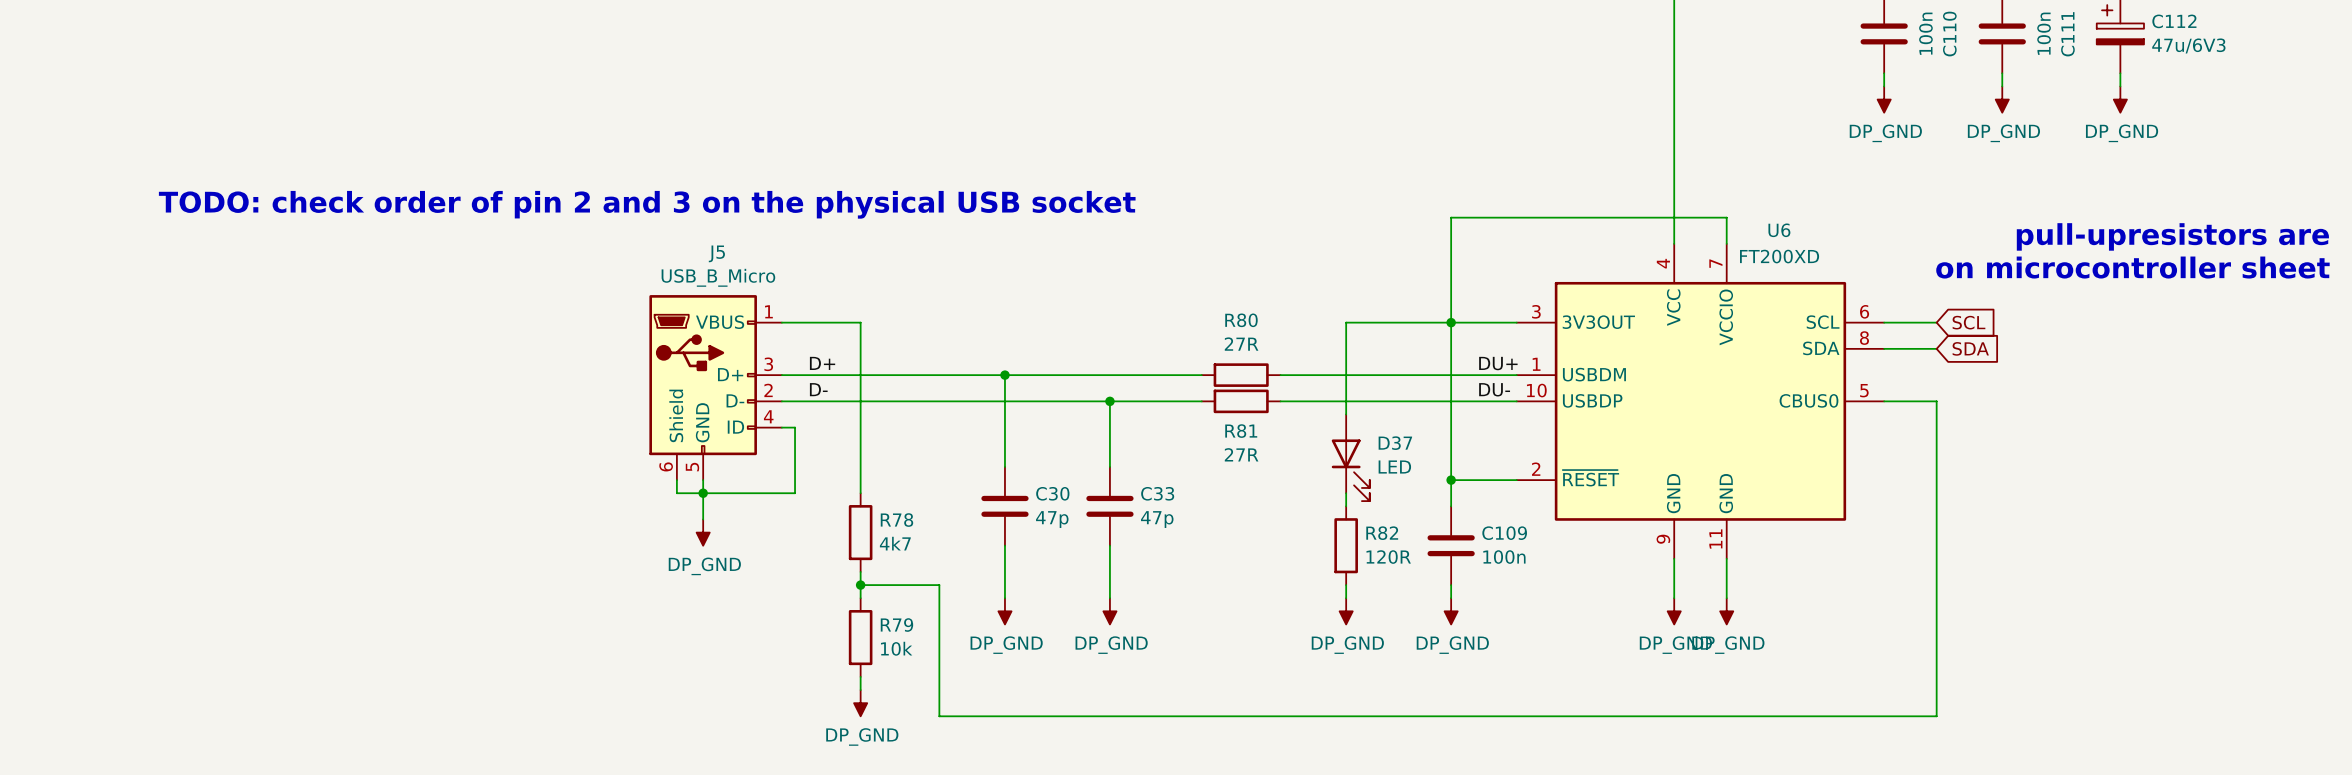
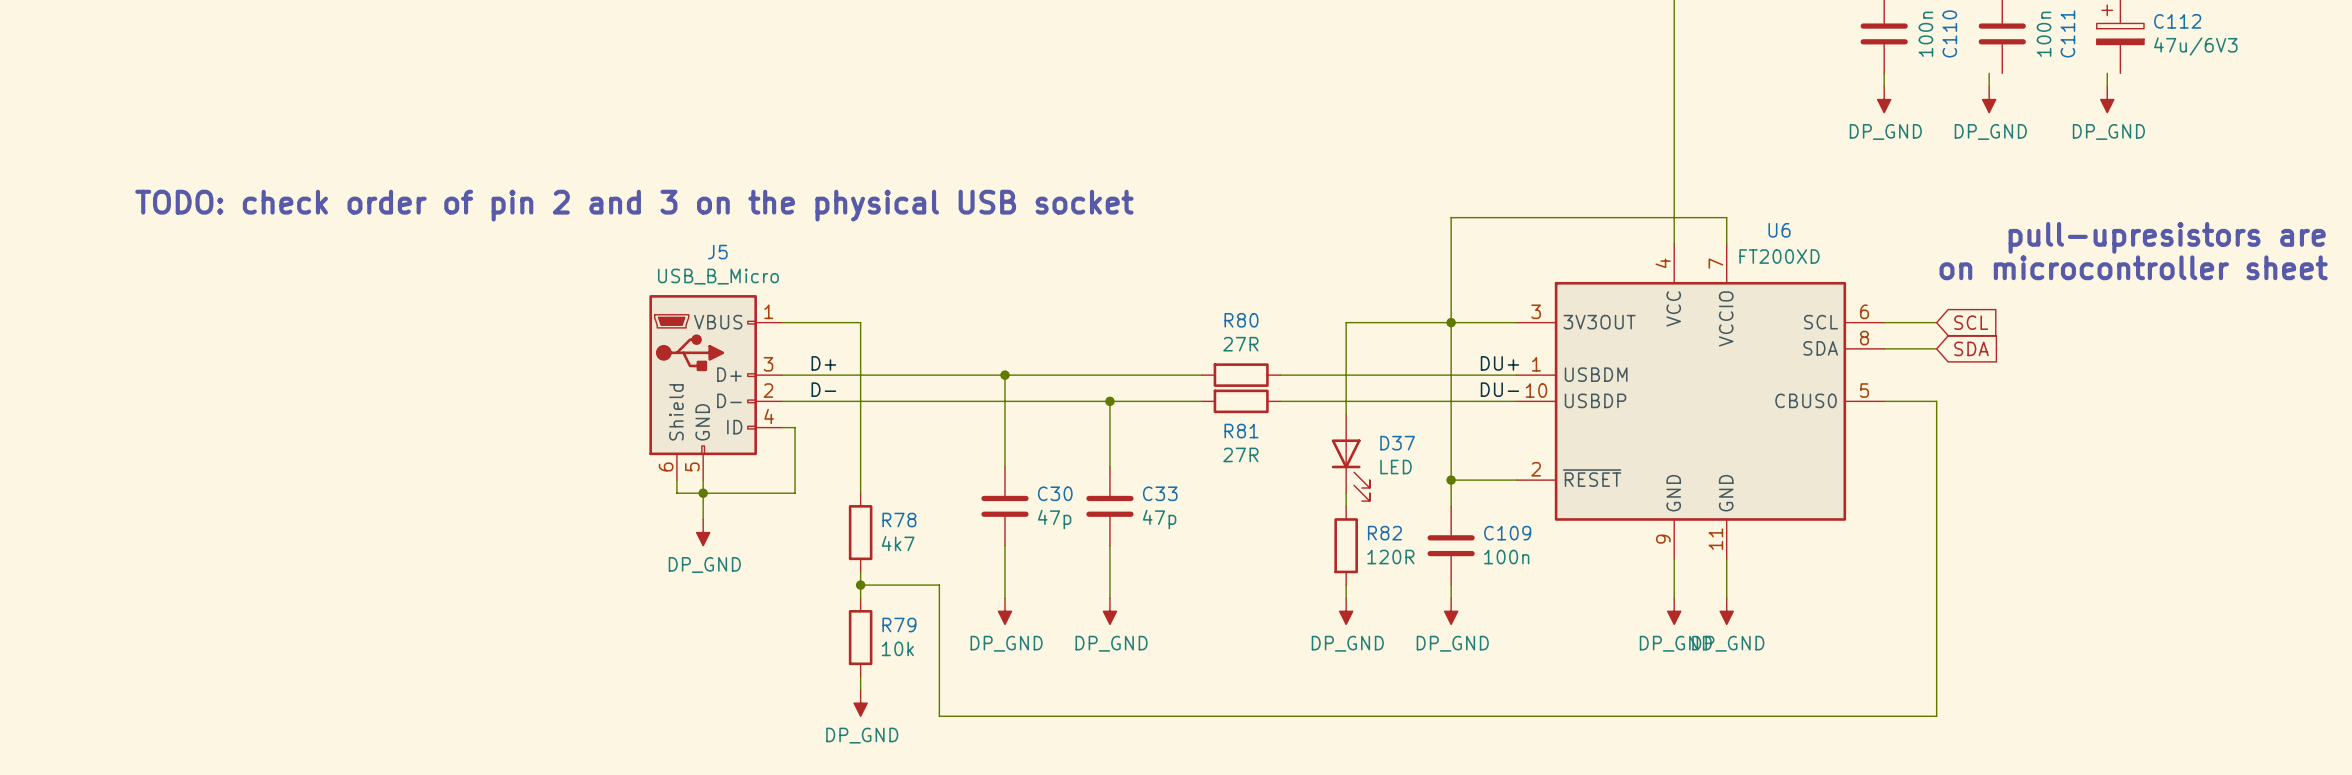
wire: (2002, 73) (2002, 86) -> (1989, 73) (1989, 86)
wire: (2120, 73) (2120, 86) -> (2107, 73) (2107, 86)
power symbol position: DP_GND (2002, 99) -> DP_GND (1989, 99)
power symbol position: DP_GND (2120, 99) -> DP_GND (2107, 99)

